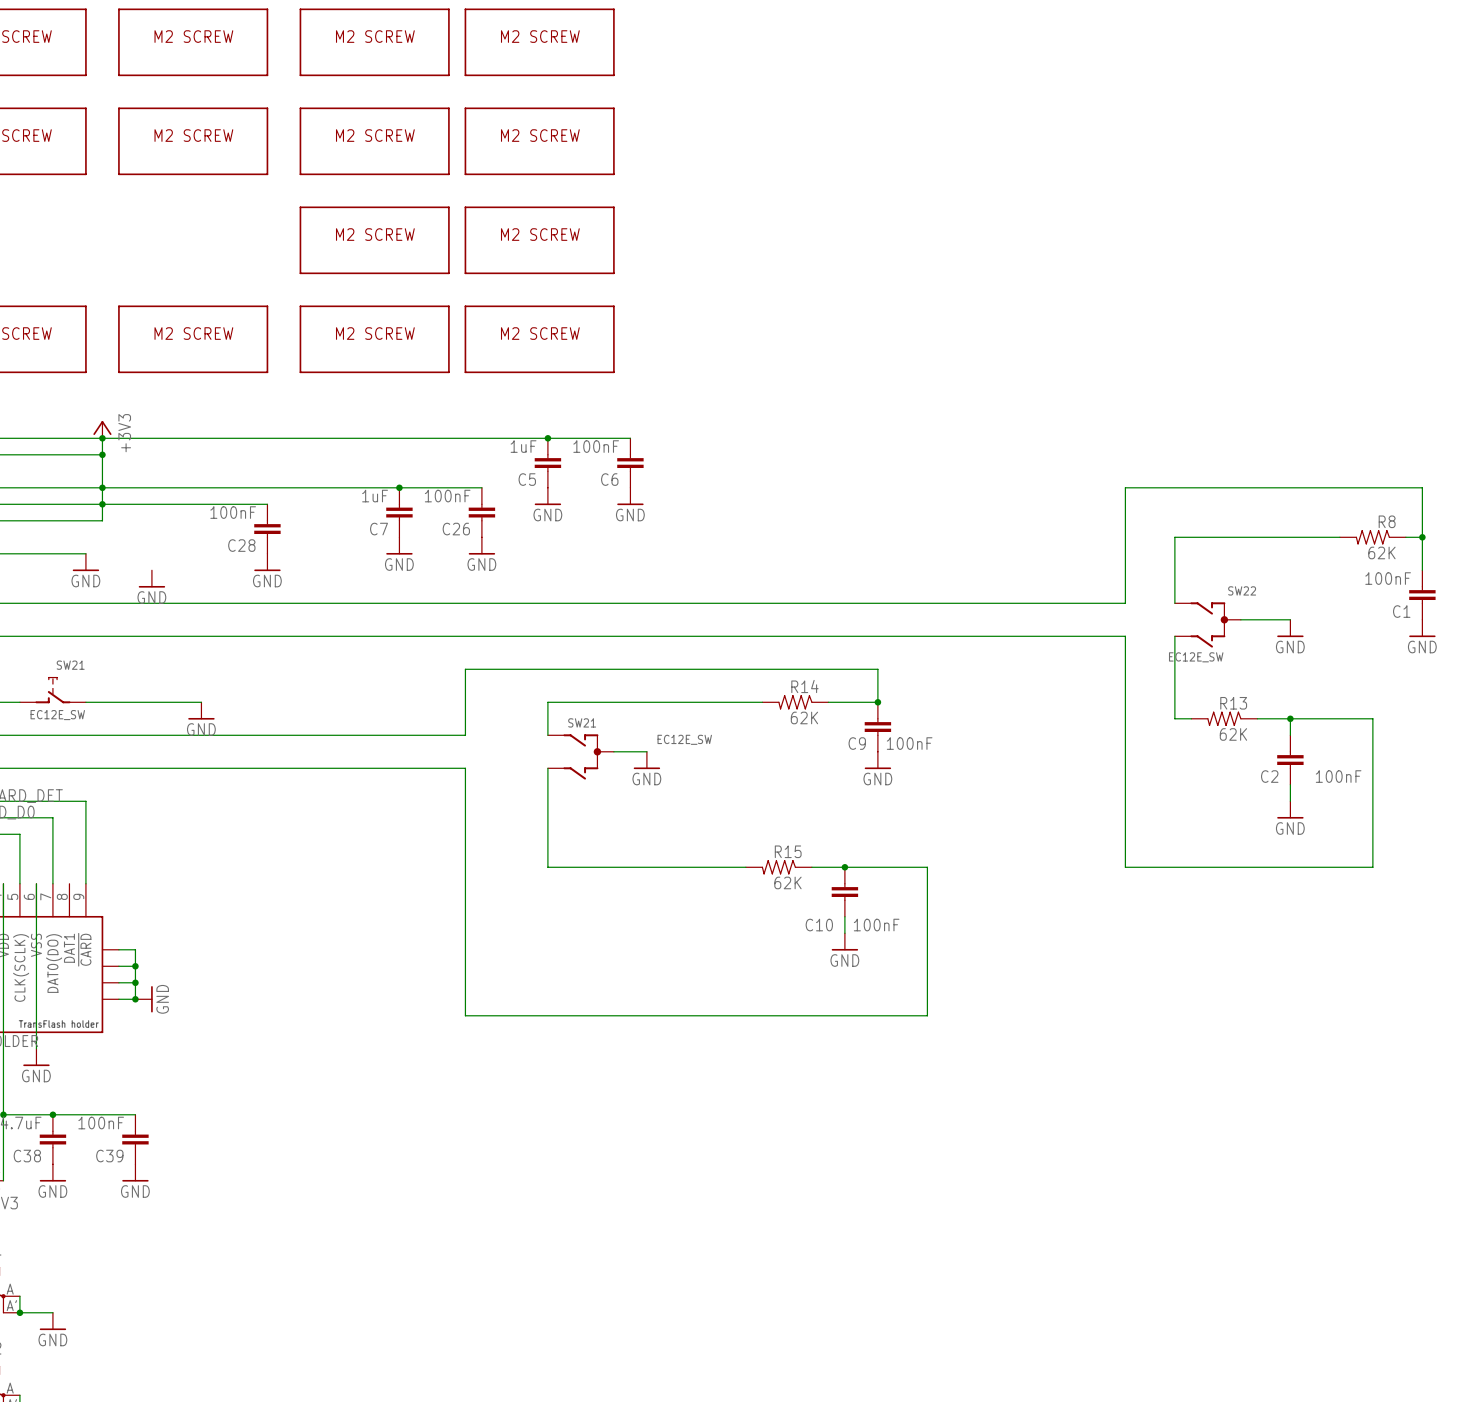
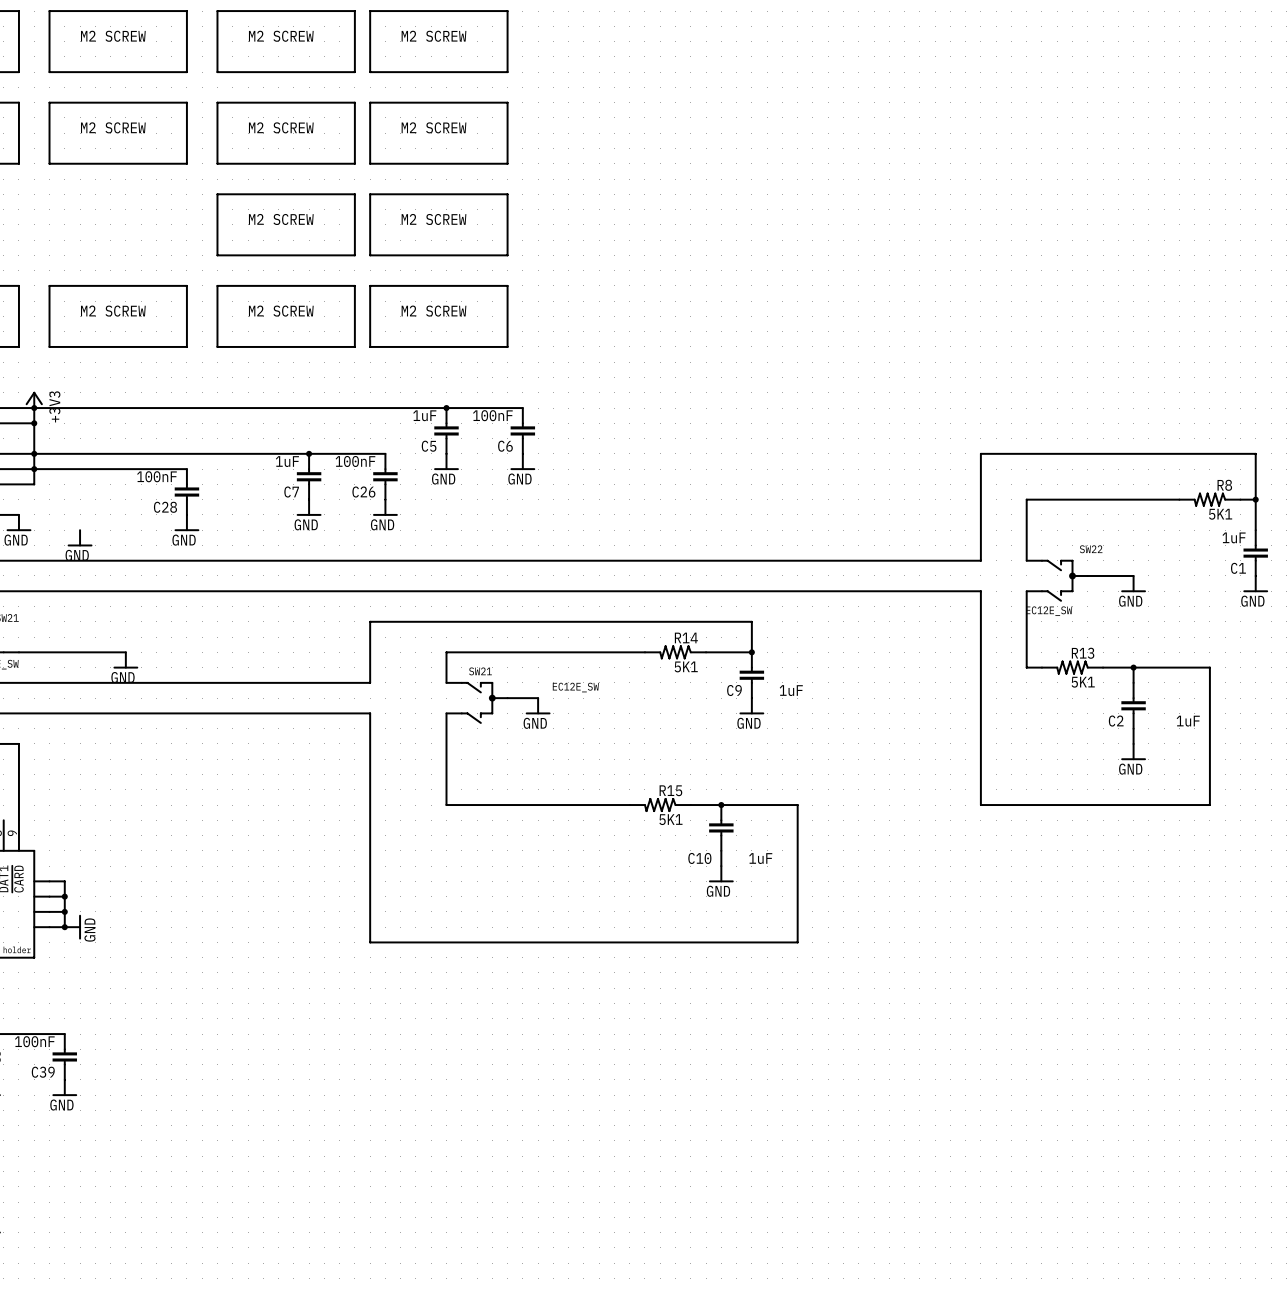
R8 value: 62K (1381, 552) -> 5K1 (1220, 514)
C1 value: 100nF (1388, 578) -> 1uF (1234, 537)
R14 value: 62K (804, 717) -> 5K1 (686, 666)
R13 value: 62K (1233, 734) -> 5K1 (1083, 682)
C9 value: 100nF (909, 743) -> 1uF (791, 690)
C2 value: 100nF (1338, 776) -> 1uF (1188, 721)
R15 value: 62K (787, 882) -> 5K1 (670, 819)
C10 value: 100nF (876, 925) -> 1uF (760, 858)

